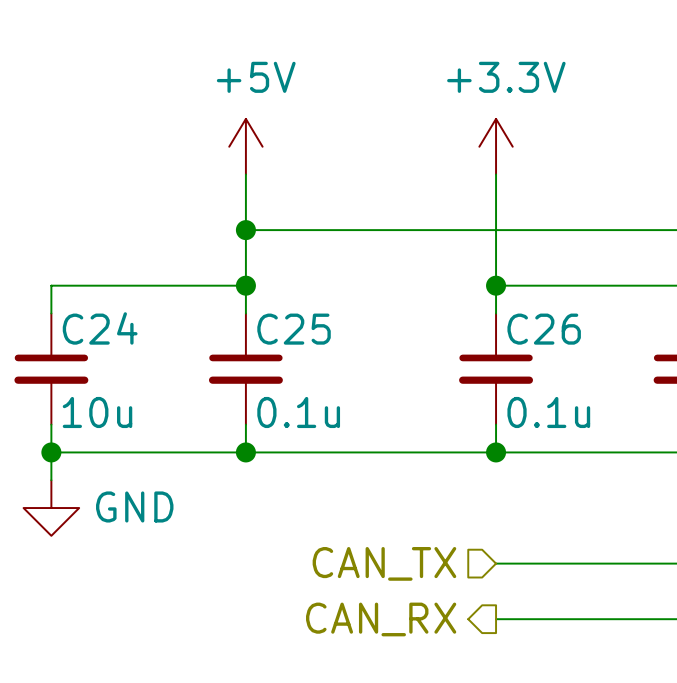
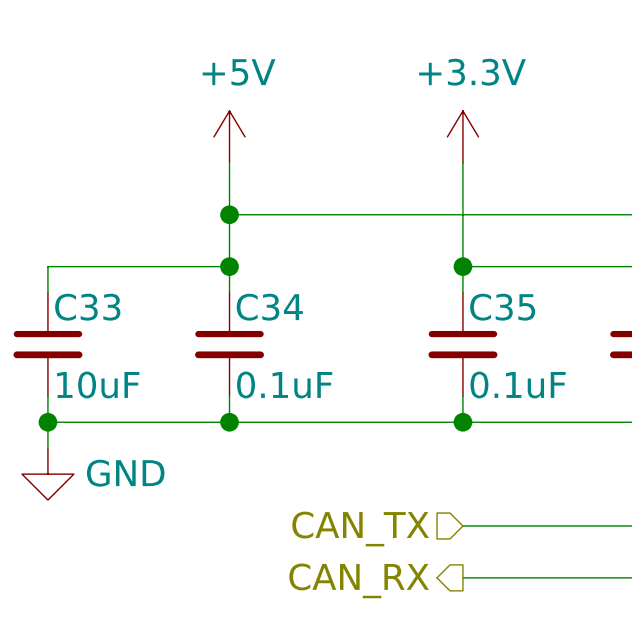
C24 name: C24 (100, 328) -> C33 (87, 307)
C25 name: C25 (294, 329) -> C34 (269, 307)
C26 name: C26 (544, 329) -> C35 (502, 307)
C24 value: 10u (97, 412) -> 10uF (98, 384)
C25 value: 0.1u (298, 412) -> 0.1uF (284, 384)
C26 value: 0.1u (548, 412) -> 0.1uF (518, 384)

